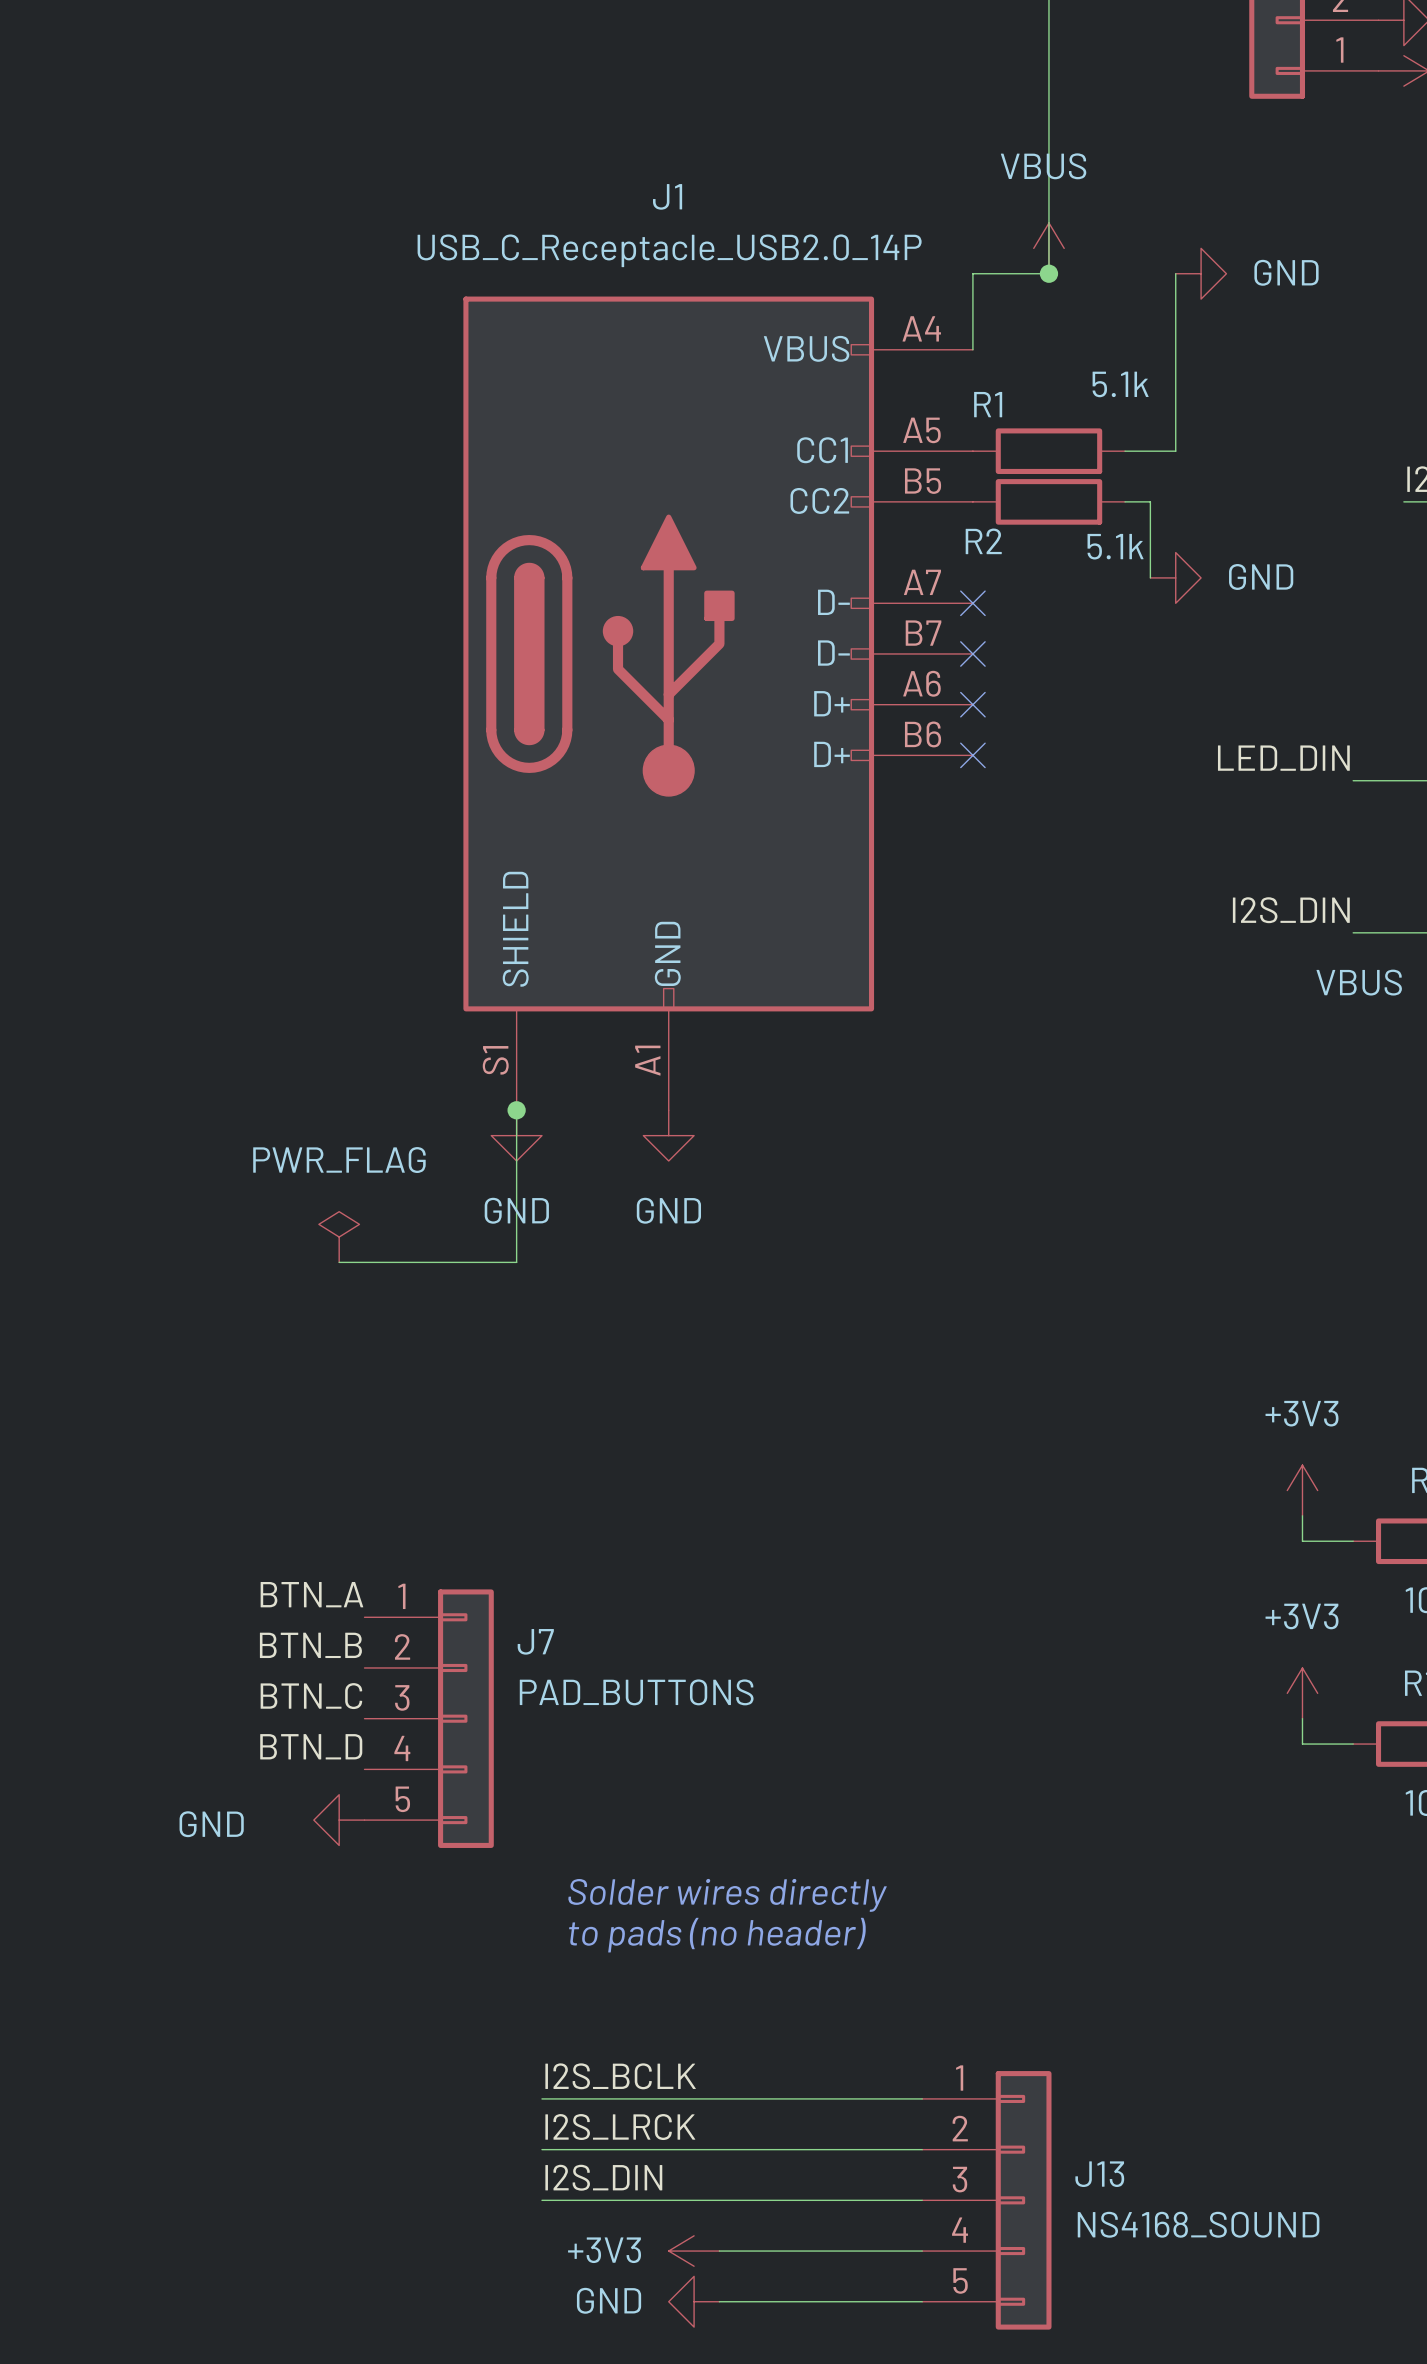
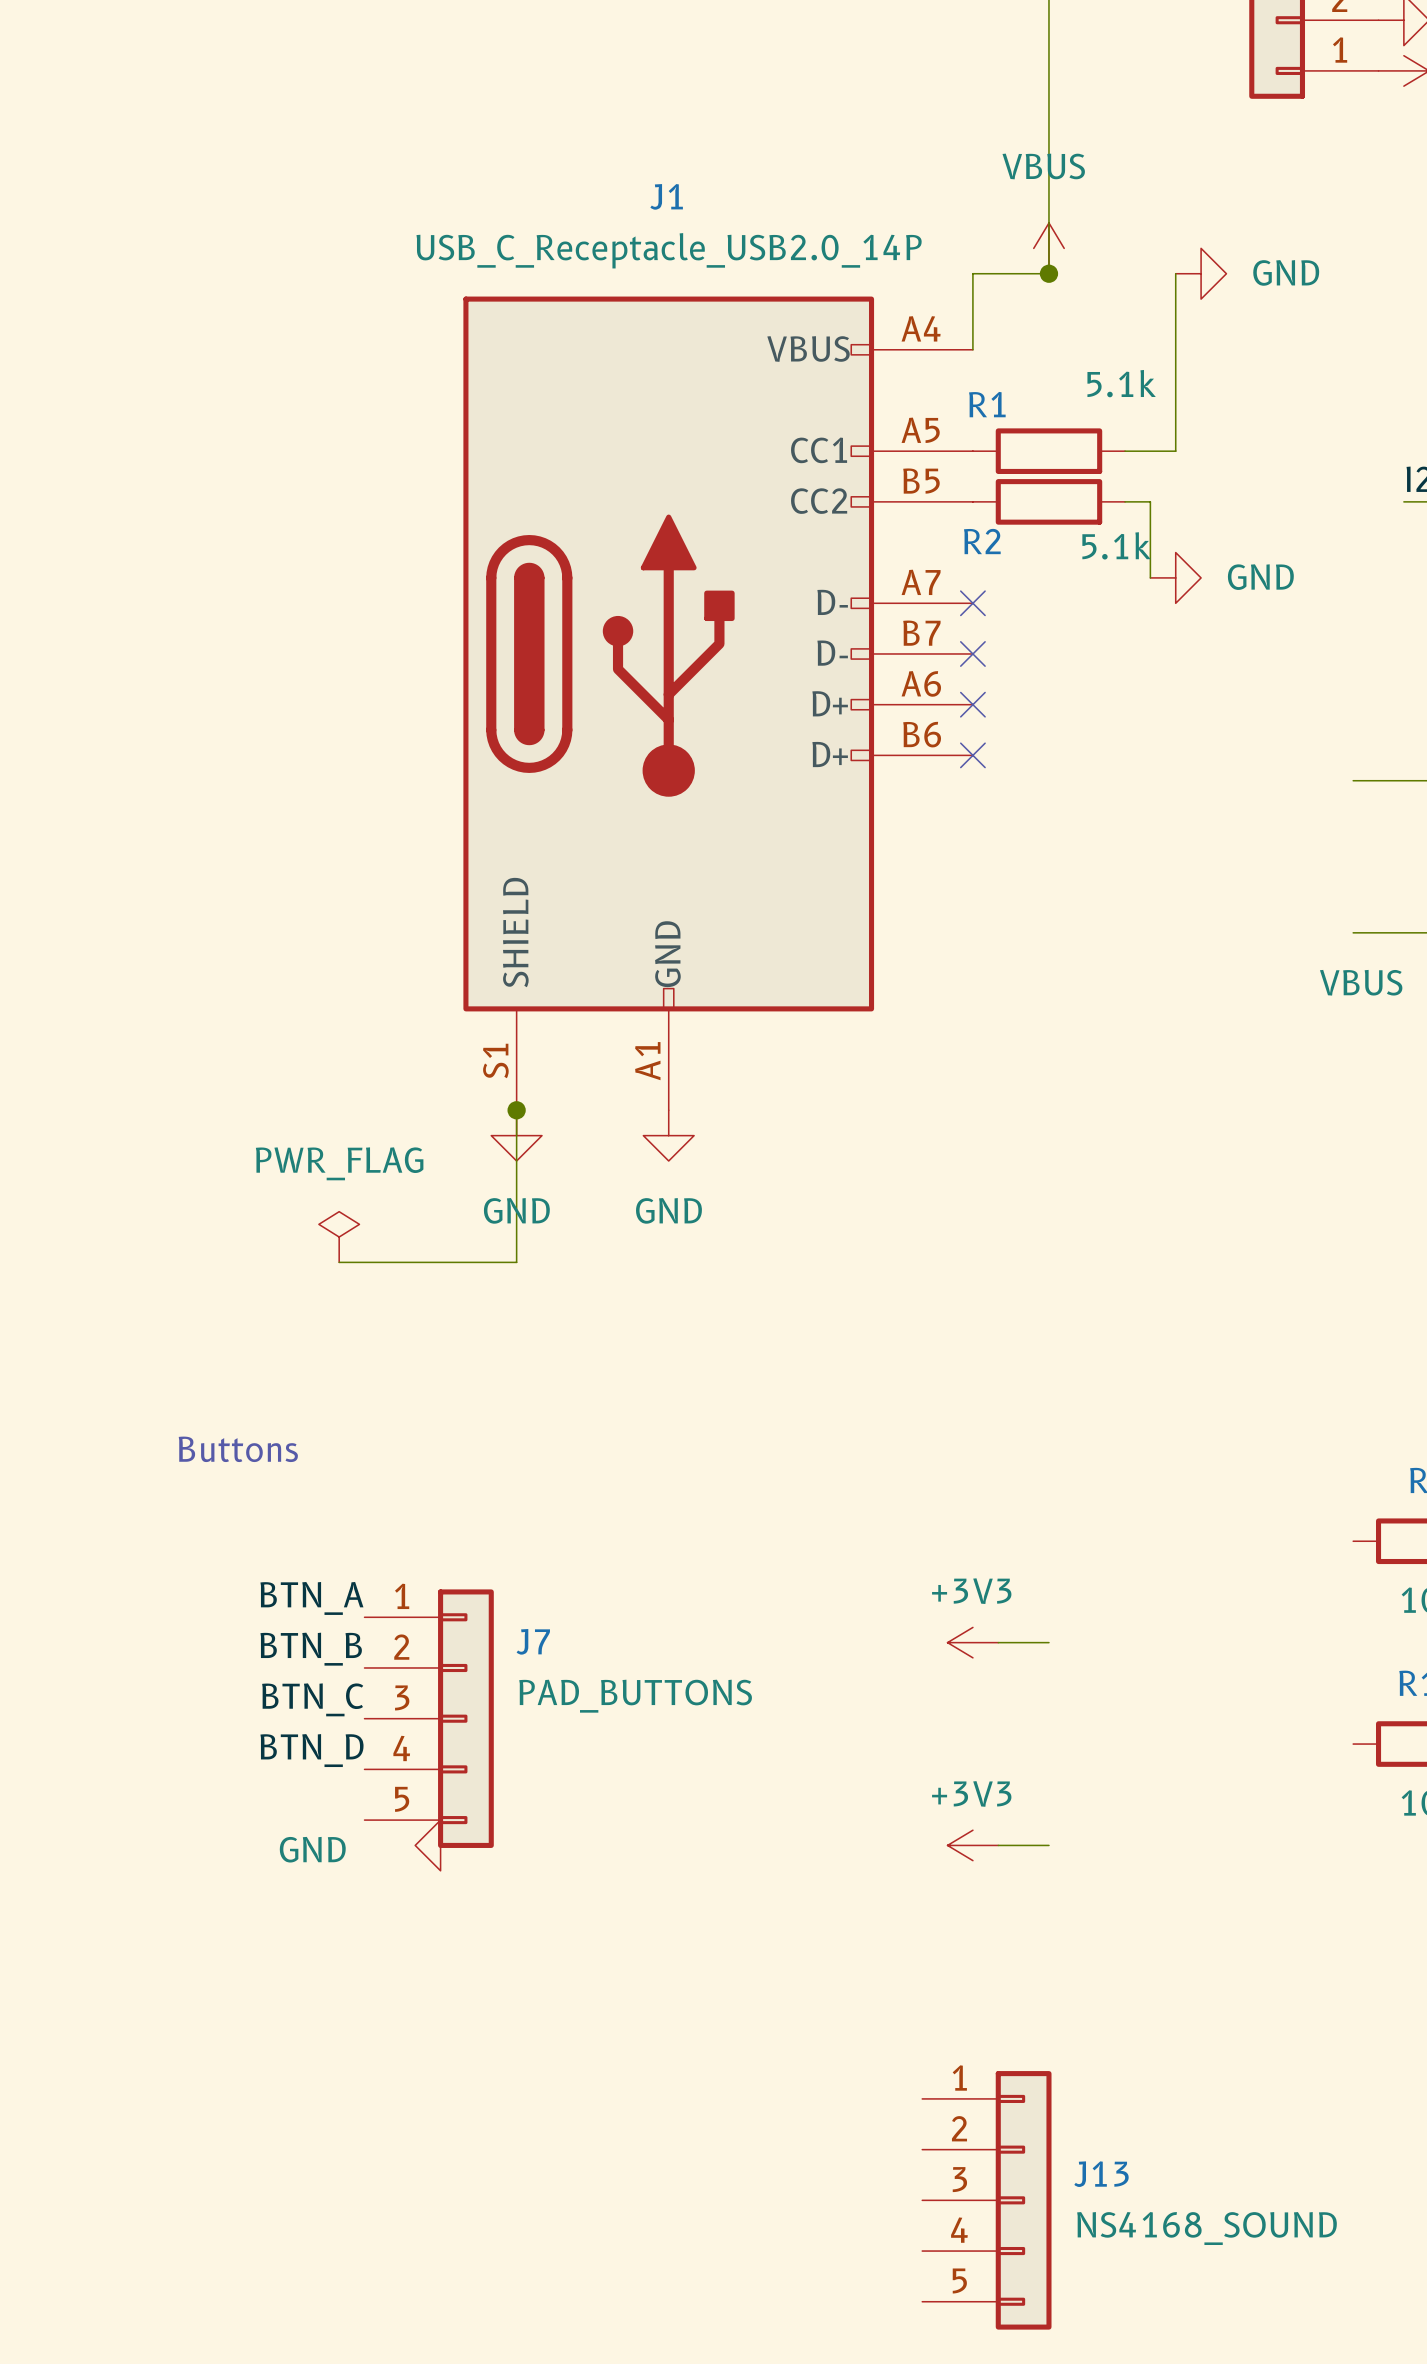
label: LED_DIN (1283, 758) -> none
label: I2S_DIN (1291, 910) -> none
text: none -> Buttons (238, 1449)
power symbol: +3V3 (1302, 1490) -> none
wire: (1302, 1515) (1302, 1541) (1353, 1541) -> none
power symbol: none -> +3V3 (972, 1642)
wire: none -> (998, 1642) (1048, 1642)
power symbol: +3V3 (1302, 1693) -> none
wire: (1302, 1718) (1302, 1744) (1353, 1744) -> none
power symbol position: GND (339, 1820) -> GND (440, 1845)
power symbol: none -> +3V3 (972, 1845)
wire: none -> (998, 1845) (1048, 1845)
text: Solder wires directly (727, 1895) -> none
text: to pads (no header) (717, 1935) -> none
label: I2S_BCLK (620, 2076) -> none
wire: (541, 2098) (922, 2098) -> none
label: I2S_LRCK (620, 2127) -> none
wire: (541, 2149) (922, 2149) -> none
label: I2S_DIN (603, 2177) -> none
wire: (541, 2200) (922, 2200) -> none
power symbol: +3V3 (694, 2251) -> none
wire: (719, 2251) (922, 2251) -> none
power symbol: GND (694, 2301) -> none
wire: (719, 2301) (922, 2301) -> none

